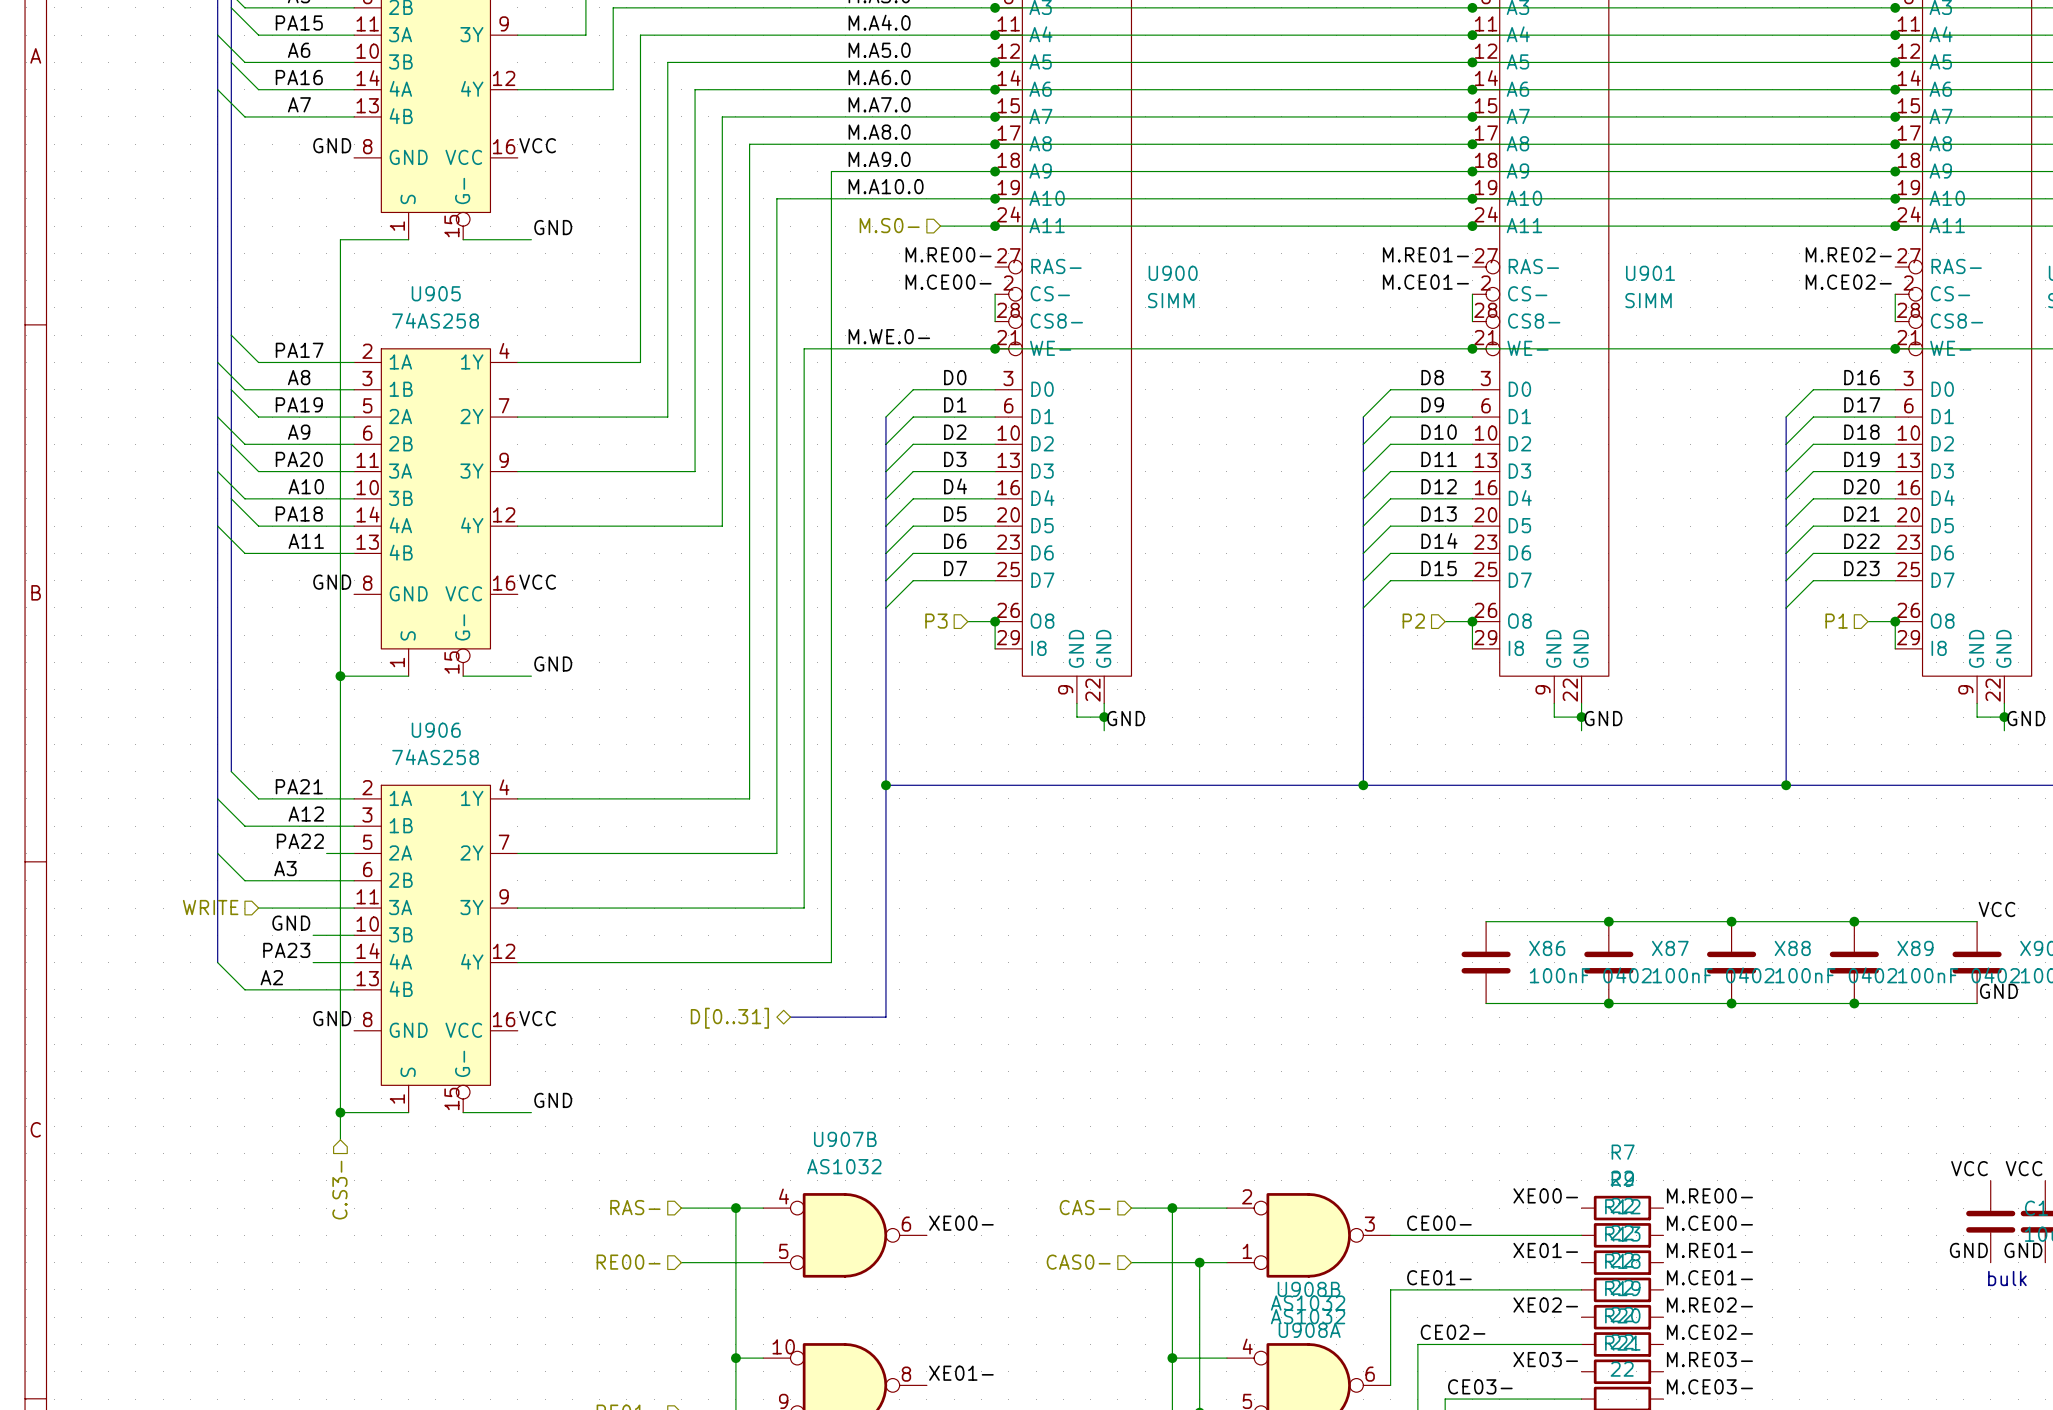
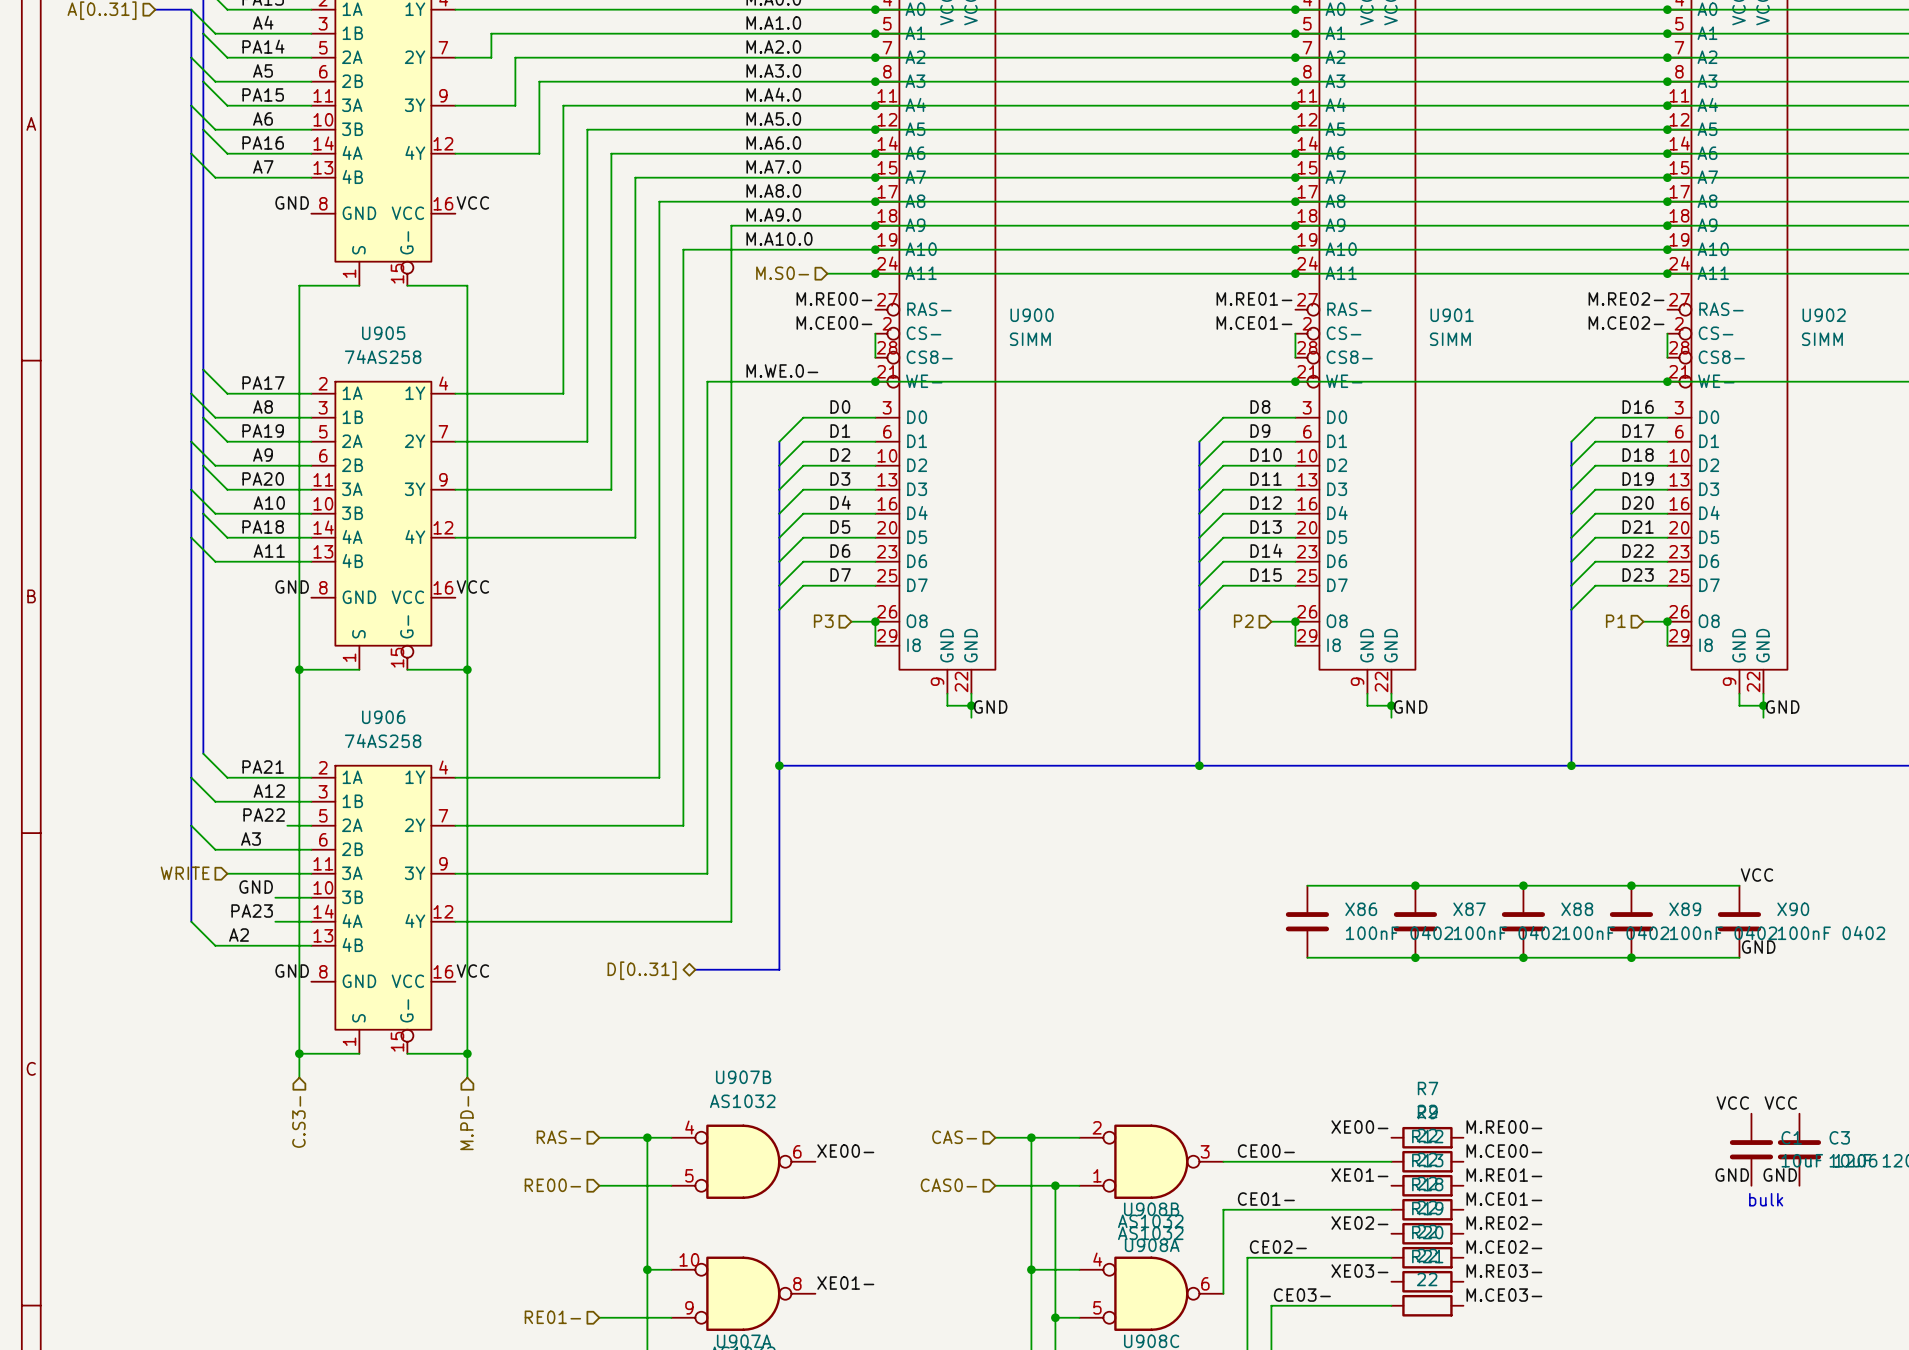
label: GND (553, 227) -> none
wire: none -> (467, 285) (467, 1077)
label: GND (553, 663) -> none
junction: none -> (467, 669)
label: GND (553, 1100) -> none
junction: none -> (467, 1053)
hierarchical label: none -> M.PD- (466, 1123)

